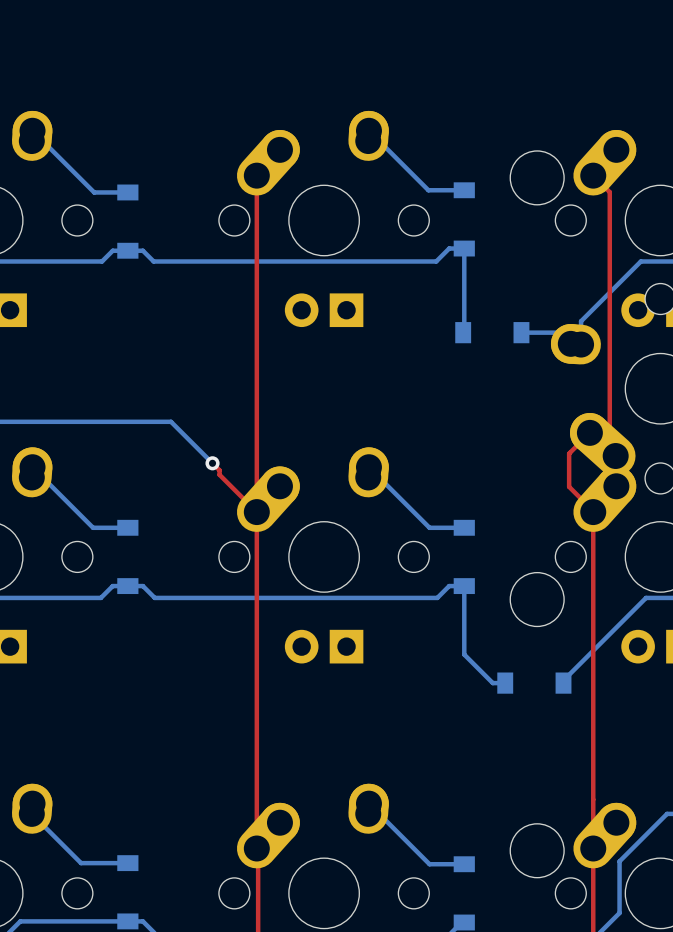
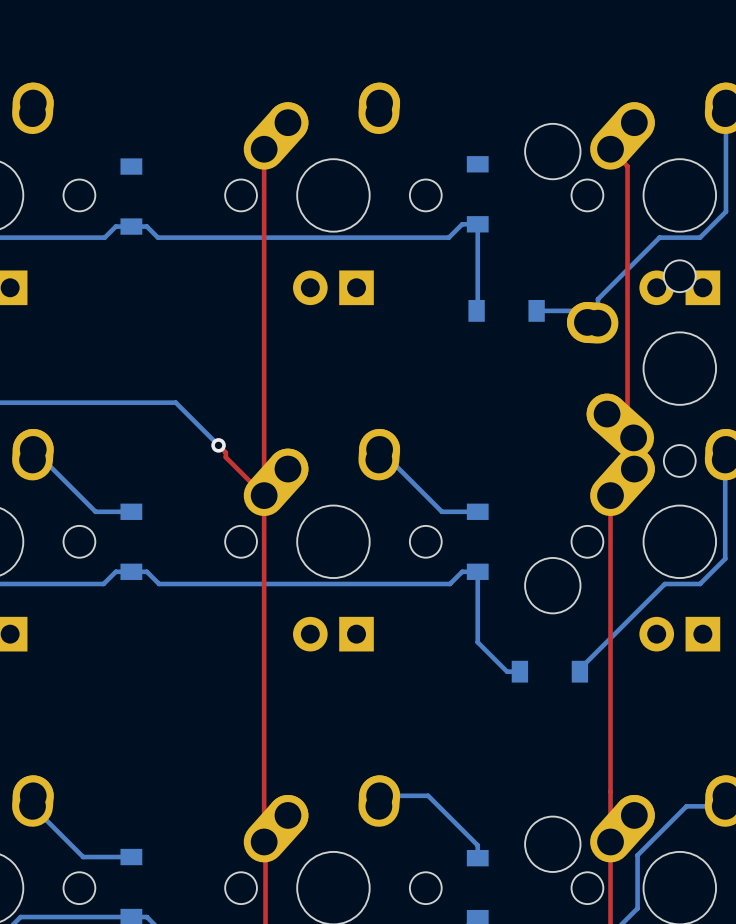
bottom track: (32, 130) (94, 192) (127, 192) -> none
bottom track: (368, 130) (428, 190) (464, 190) -> none
top track: (589, 432) (569, 453) (569, 486) (593, 510) (593, 512) (589, 507) -> none
bottom track: (368, 803) (429, 864) (464, 864) -> (378, 806) (389, 795) (428, 795) (477, 845) (477, 858)

